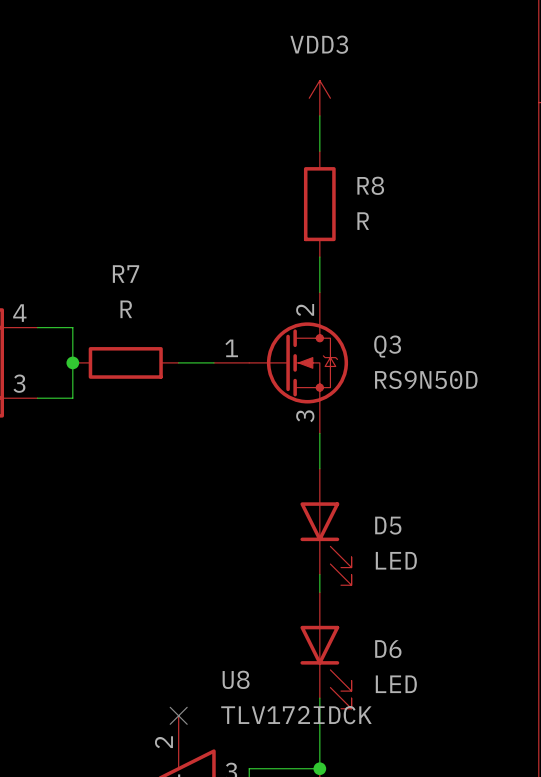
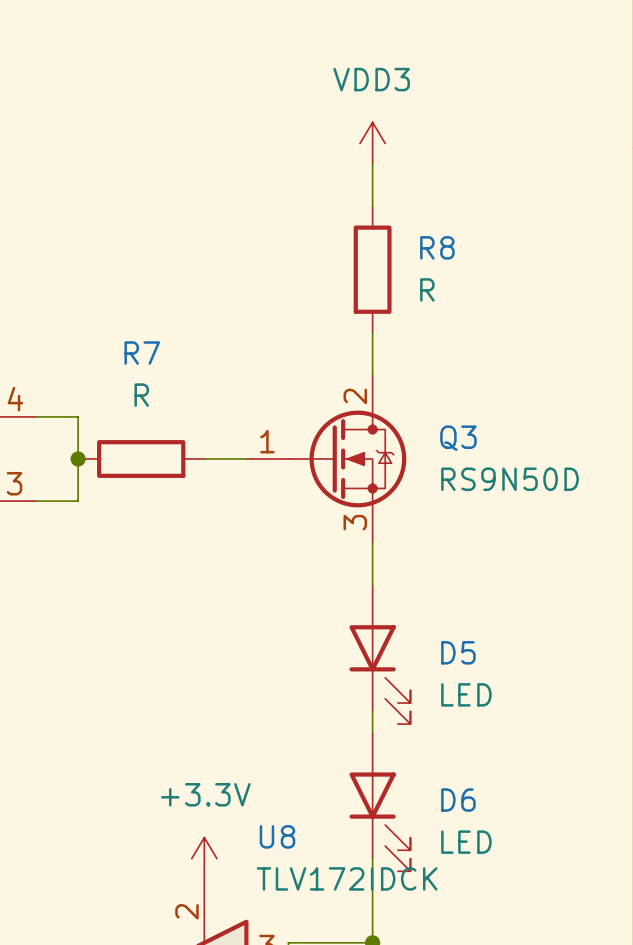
power symbol: none -> +3.3V (204, 858)
no-connect mark: (178, 715) -> none

